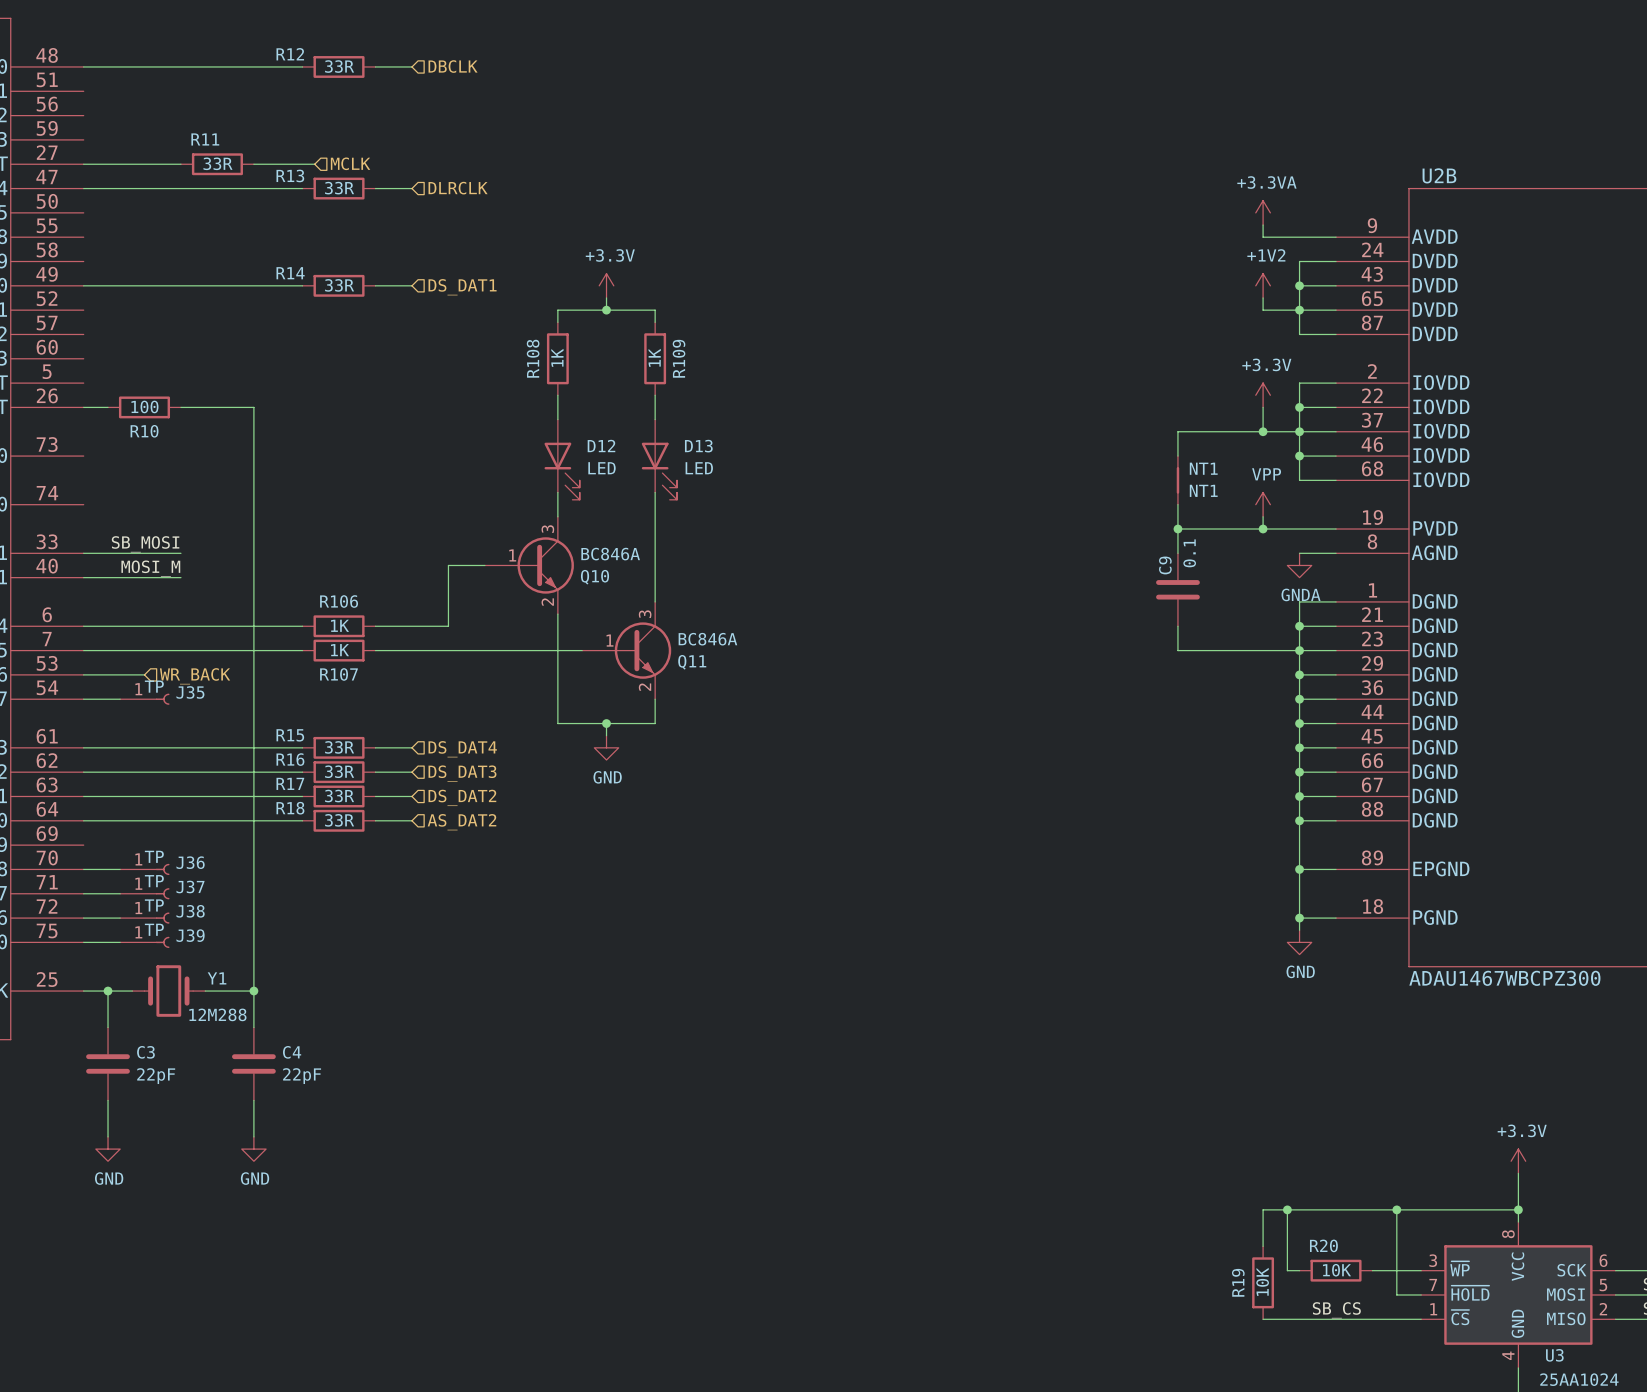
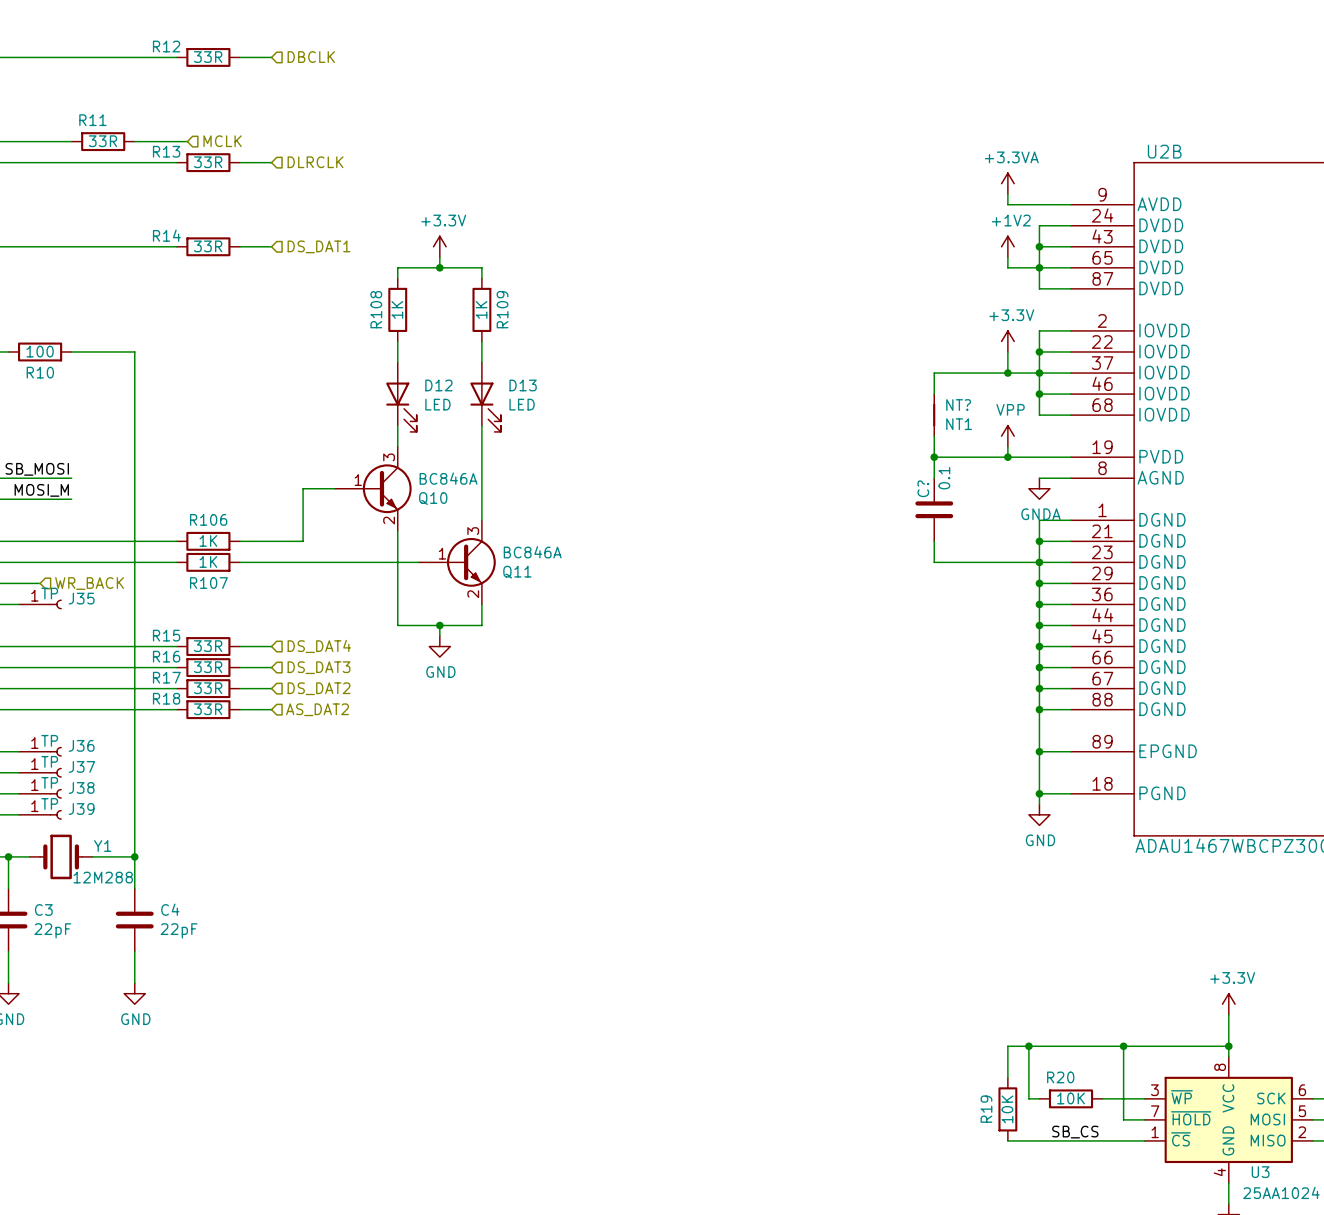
NT1 name: NT1 (1203, 468) -> NT? (958, 405)
C9 name: C9 (1165, 565) -> C? (923, 488)

